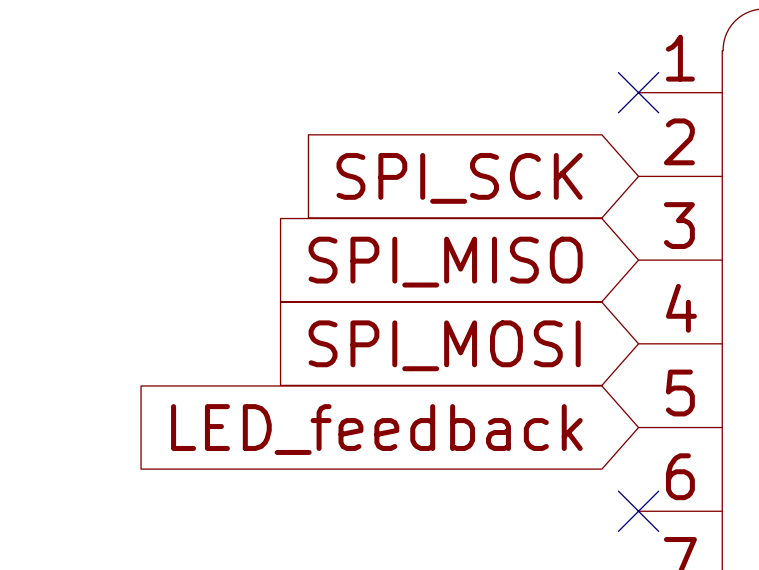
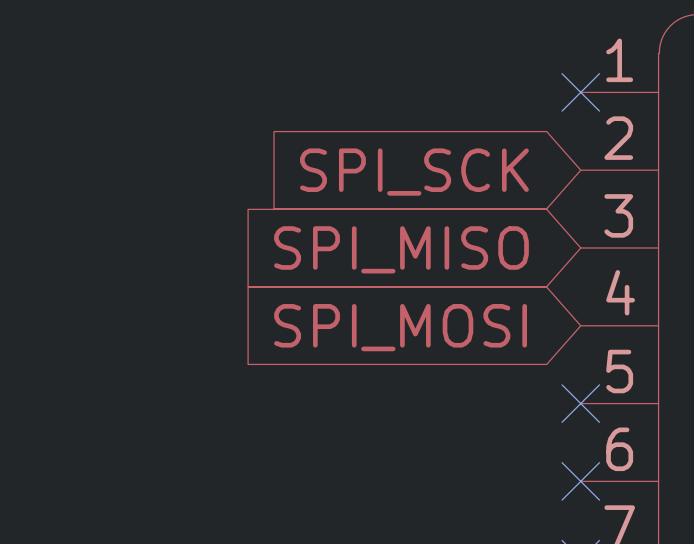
no-connect mark: none -> (580, 403)
global label: LED_feedback (376, 429) -> none

